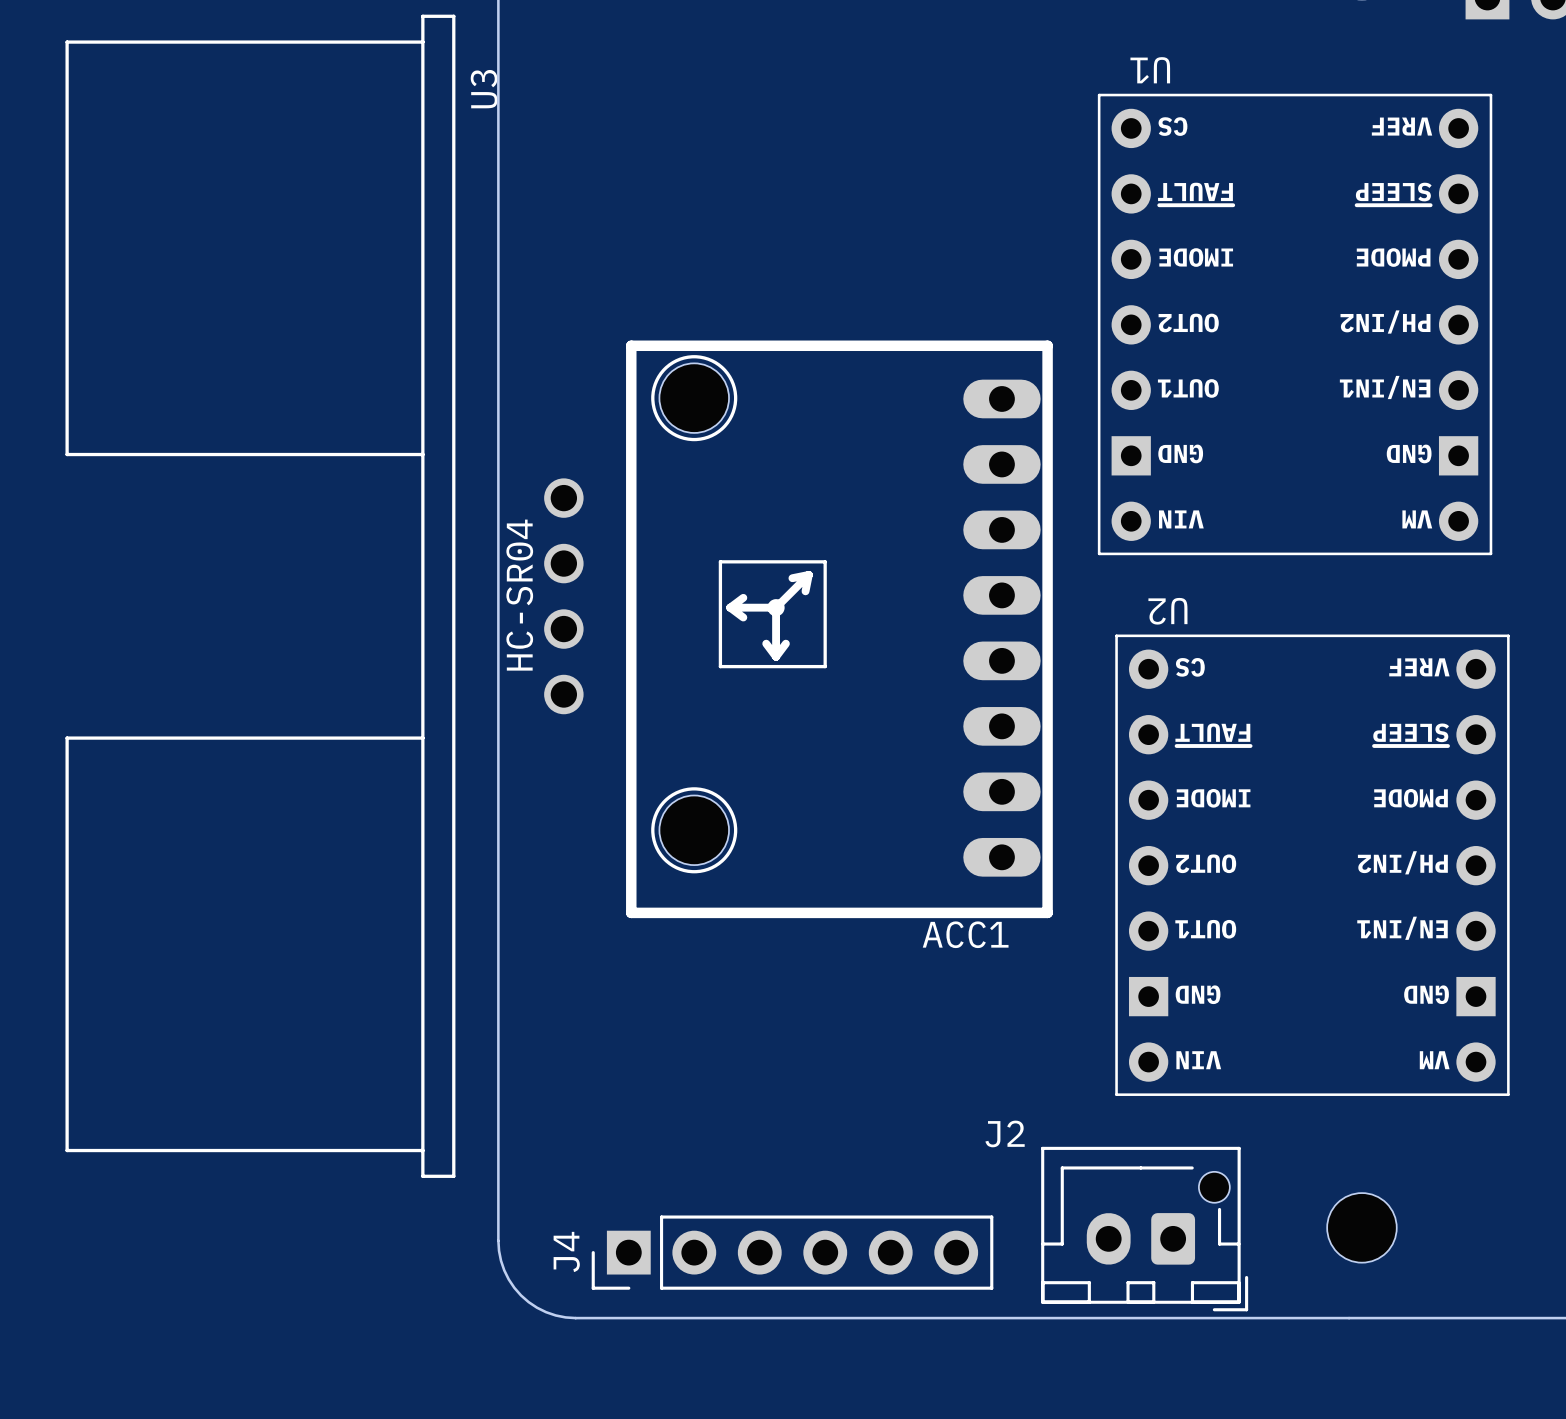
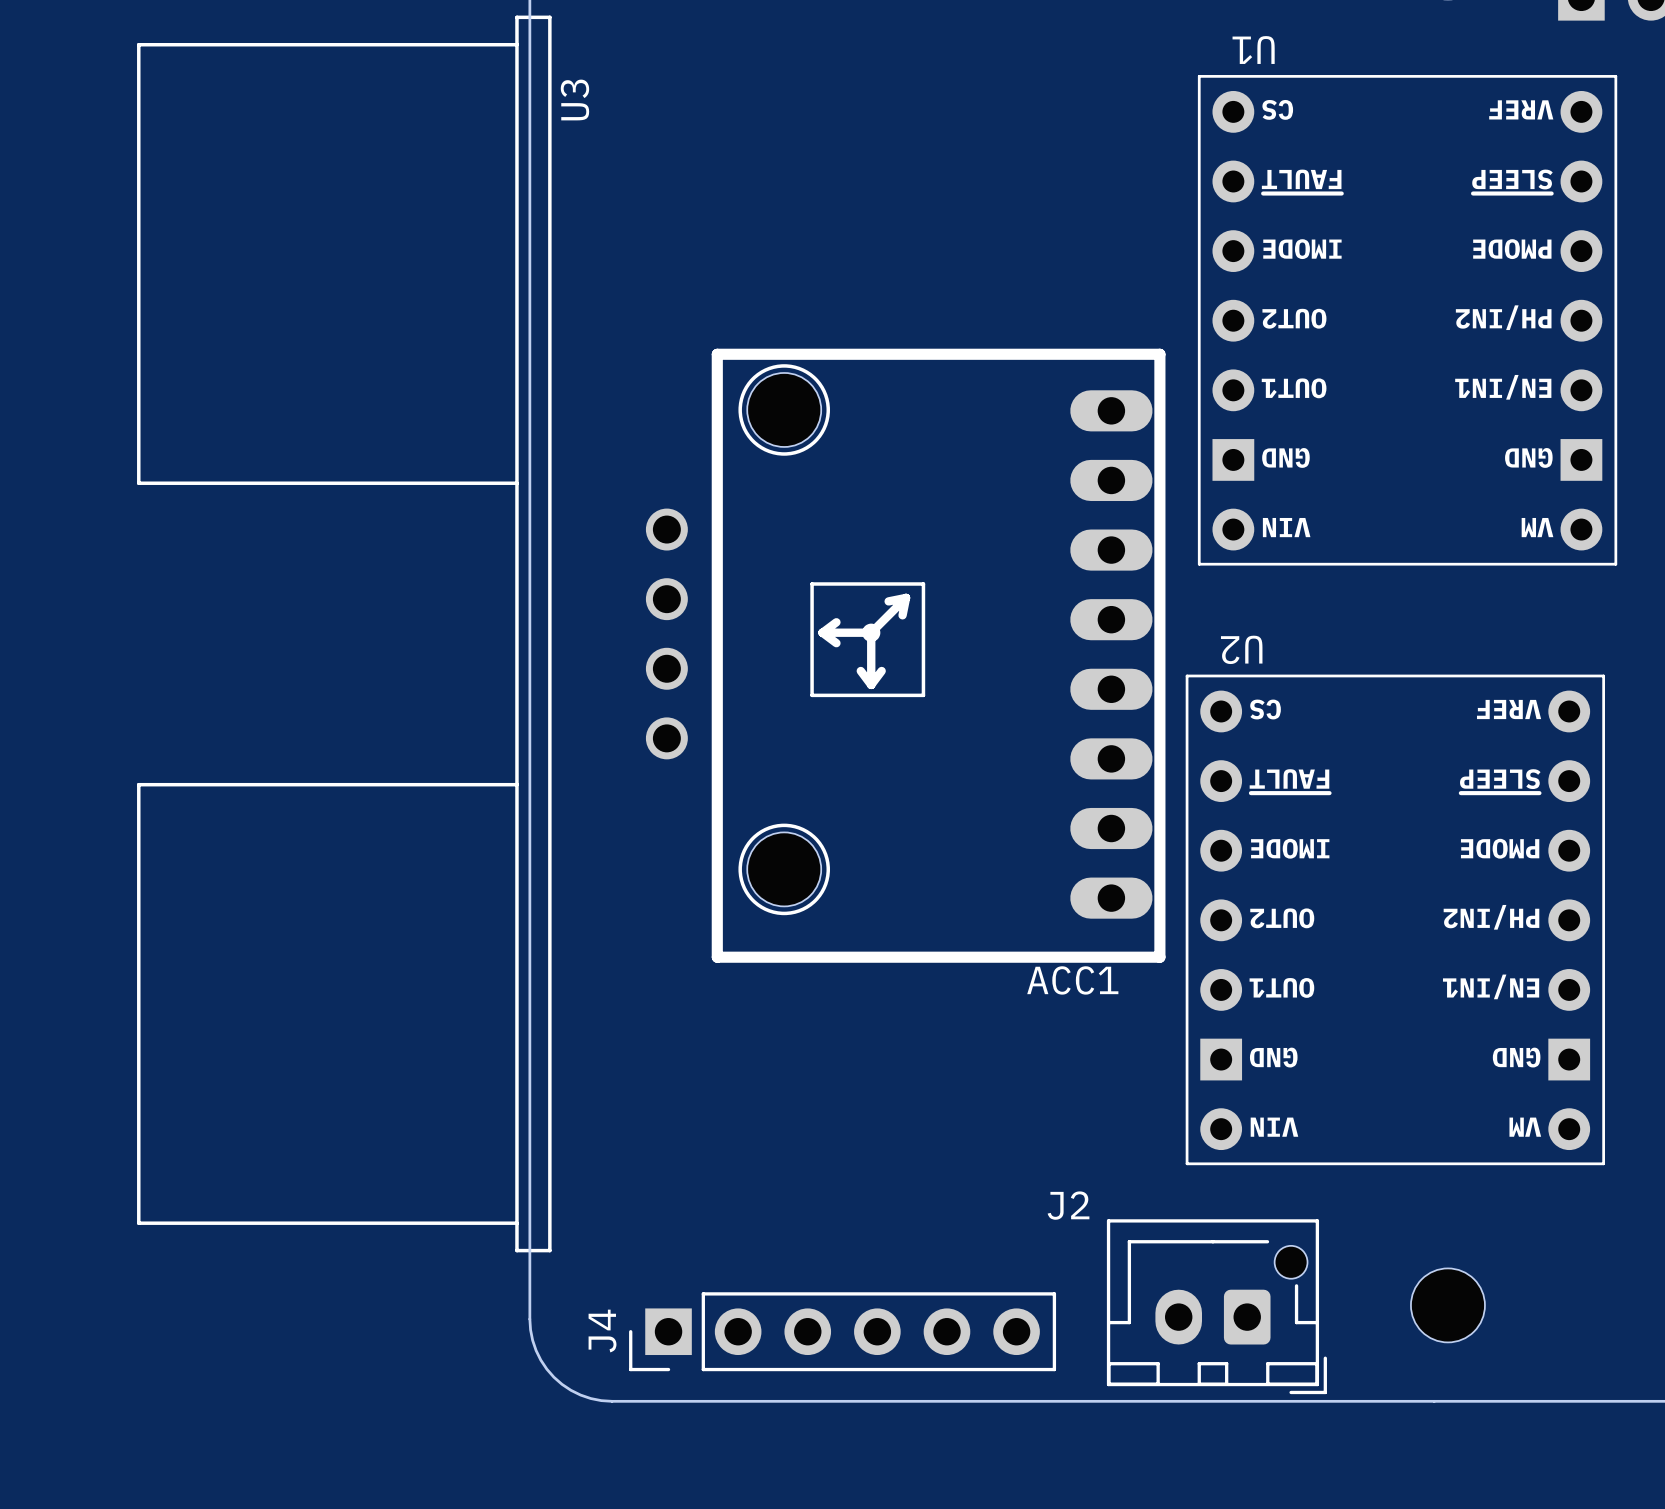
U3 name position: U3 (484, 89) -> U3 (574, 100)
U1 position: (1295, 324) -> (1407, 320)
part position: (694, 398) -> (784, 409)
U3 value: HC-SR04 (519, 595) -> none
U3 position: (324, 596) -> (412, 633)
ACC1 position: (839, 629) -> (938, 655)
part position: (694, 830) -> (784, 869)

